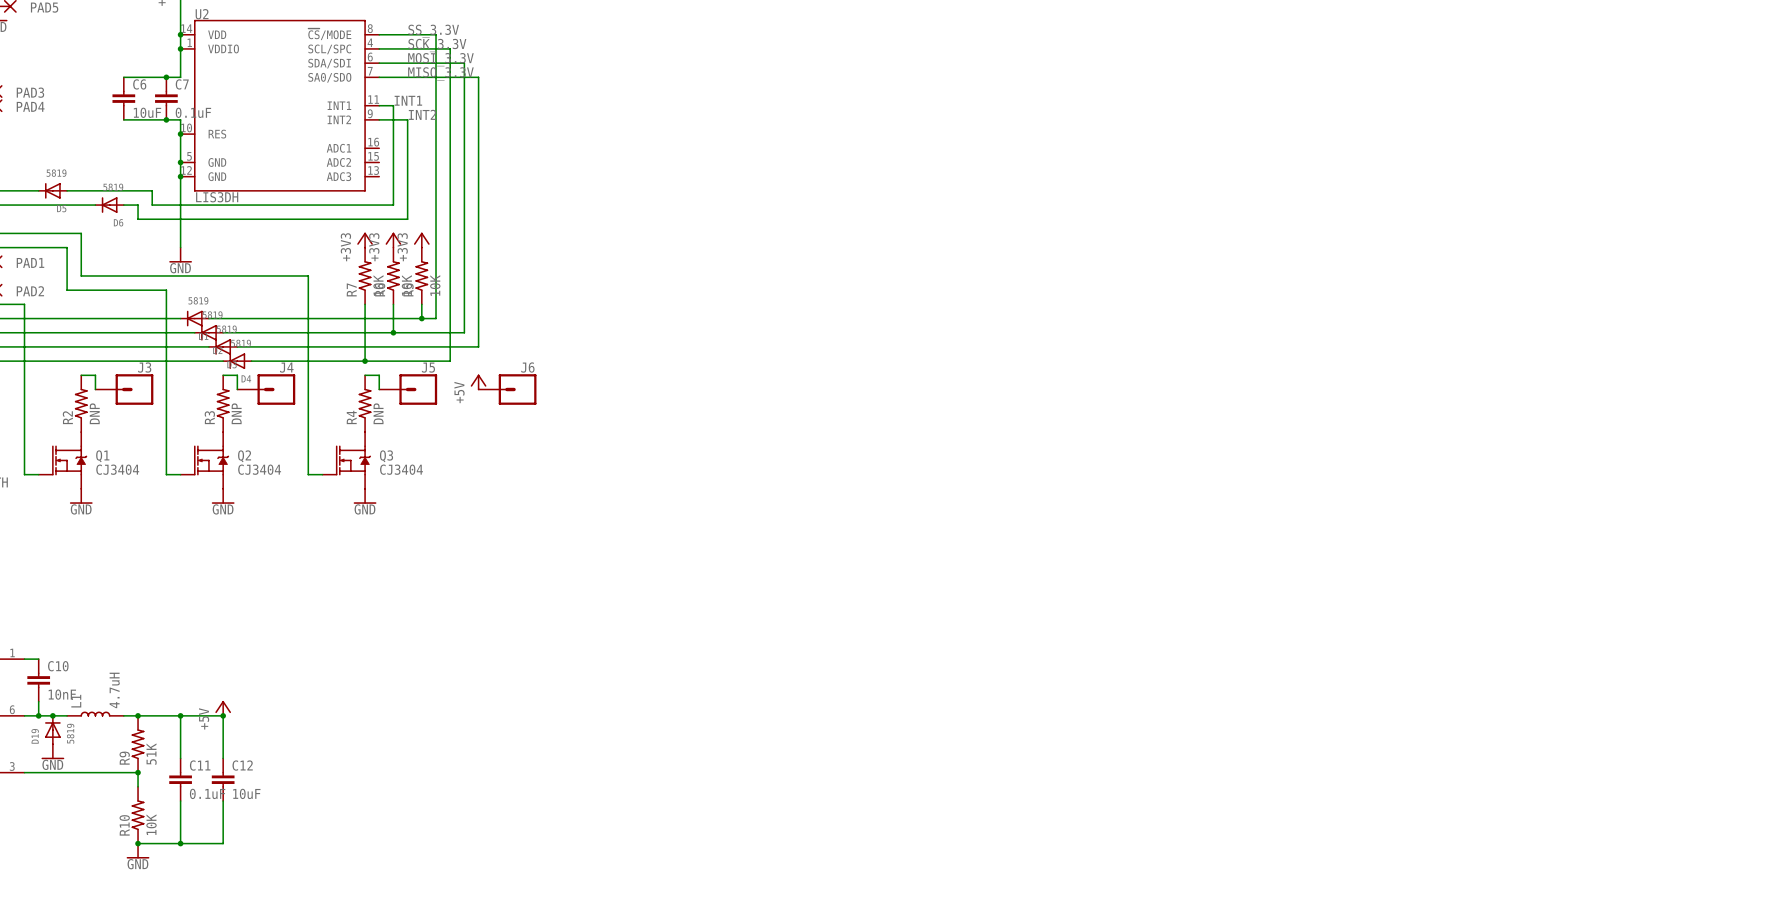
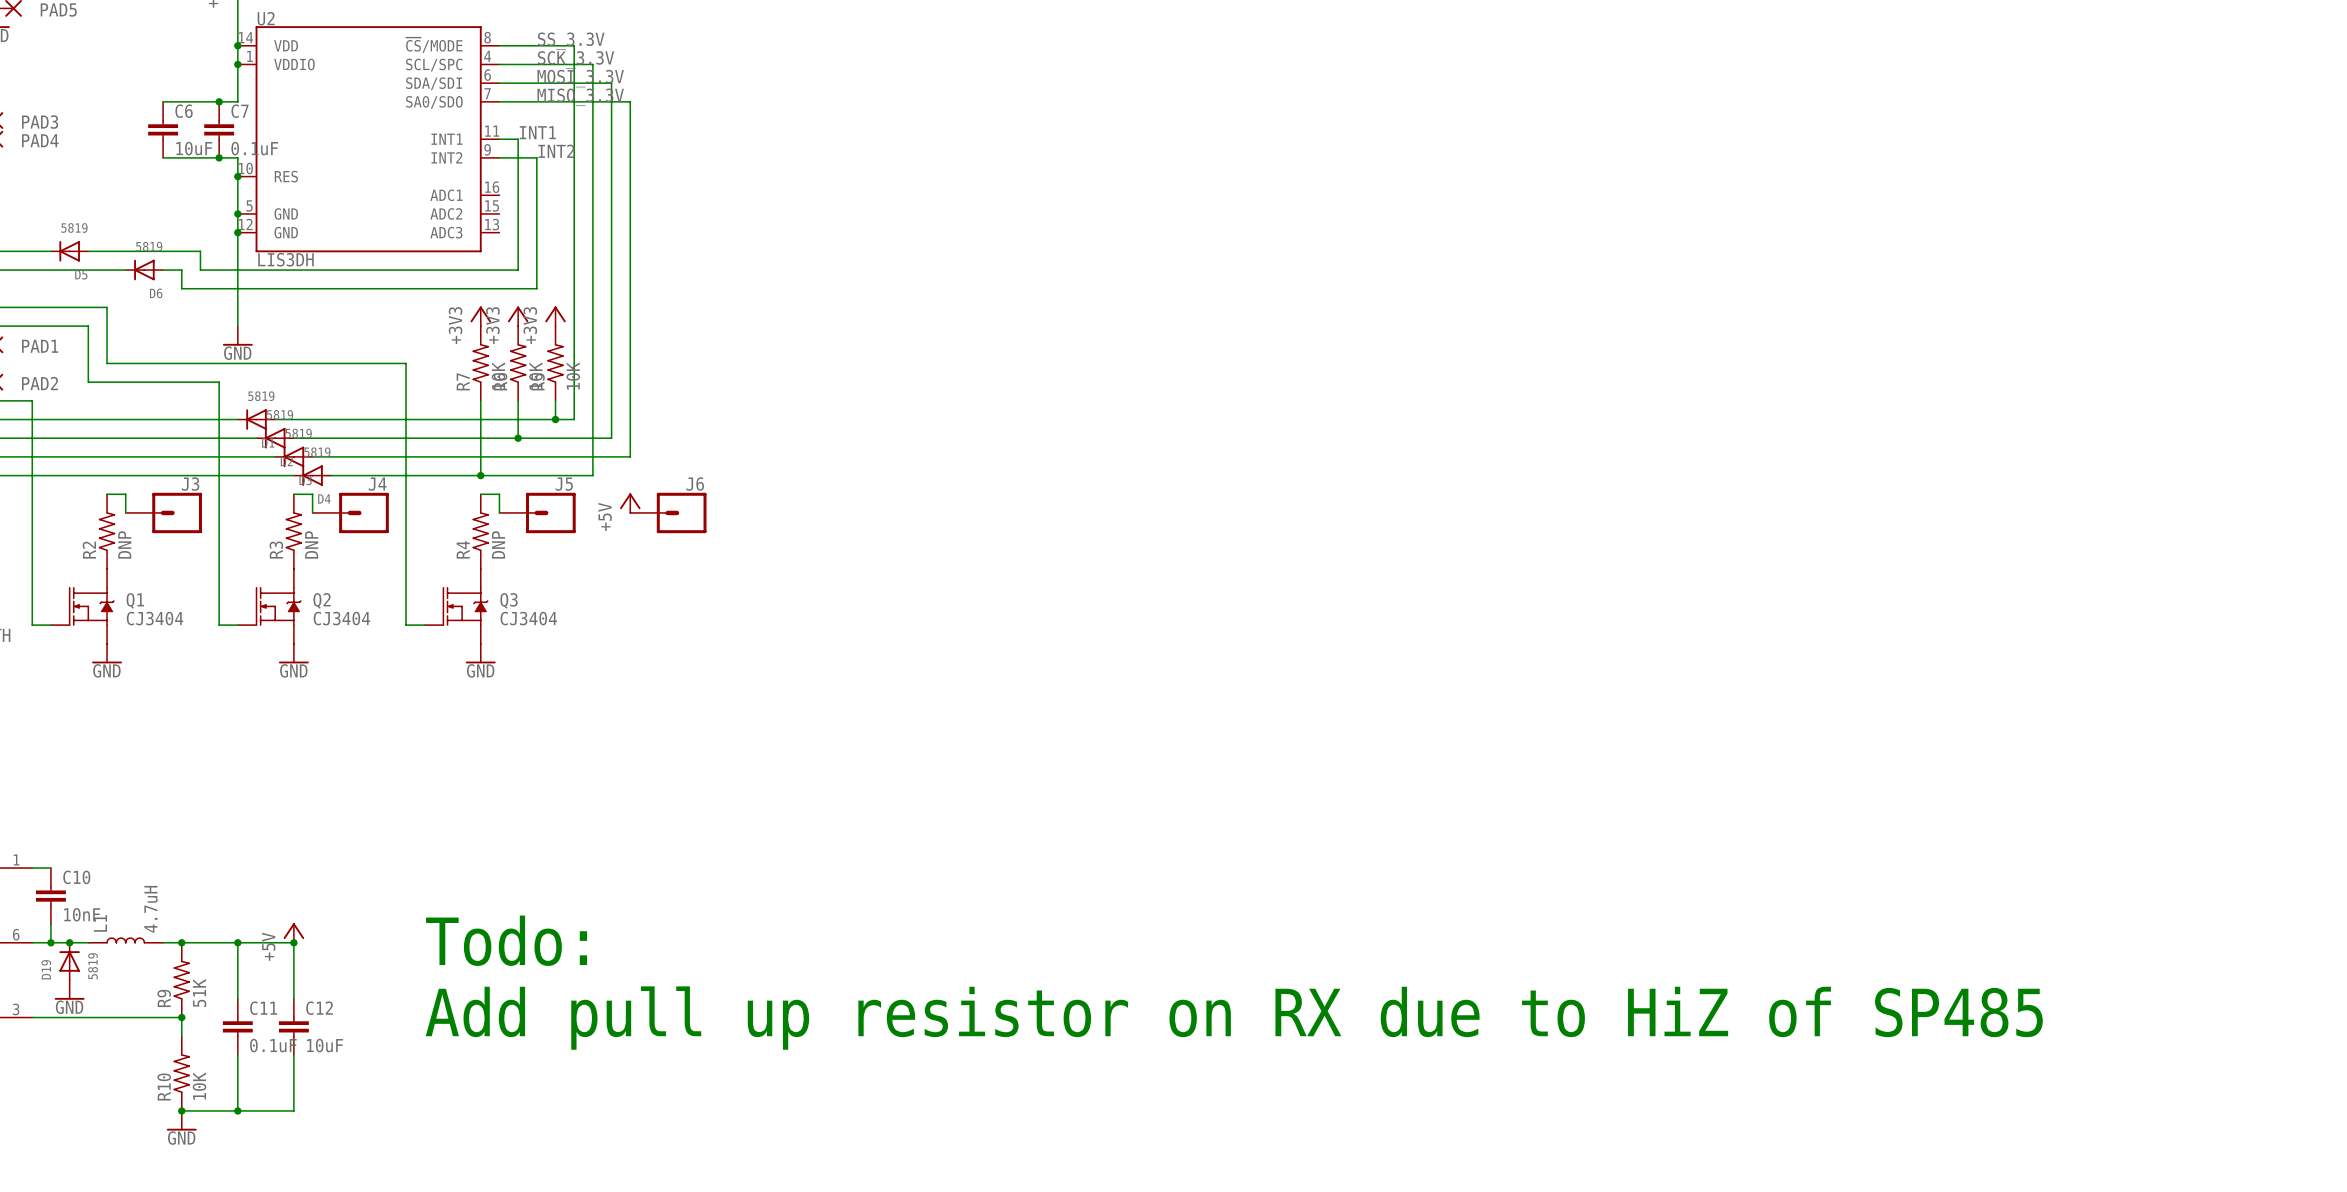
text: none -> Todo: (506, 940)
text: none -> Add pull up resistor on RX due to HiZ of SP485 (1234, 1018)

